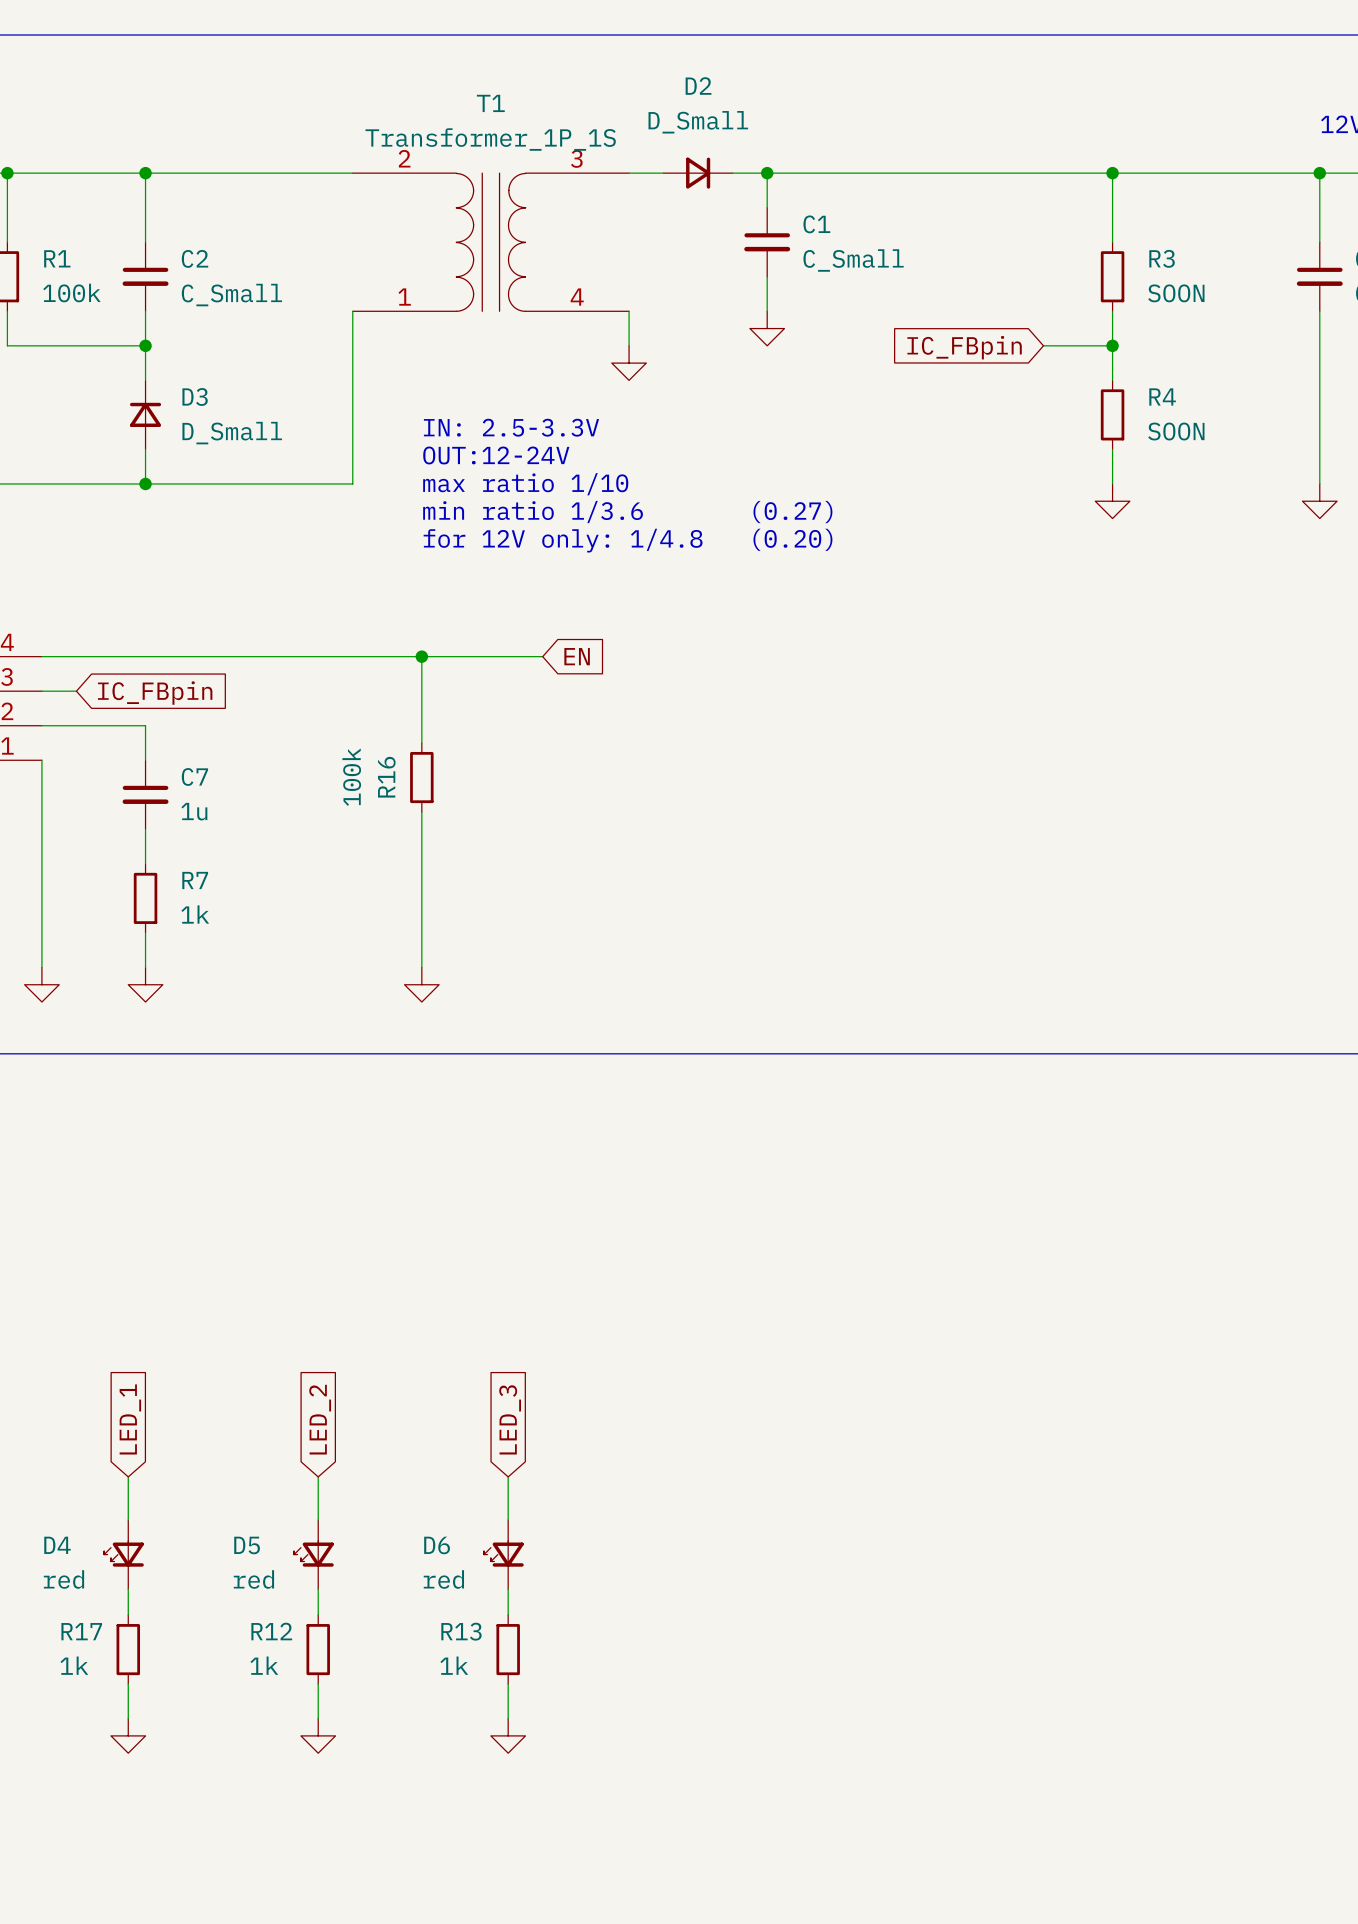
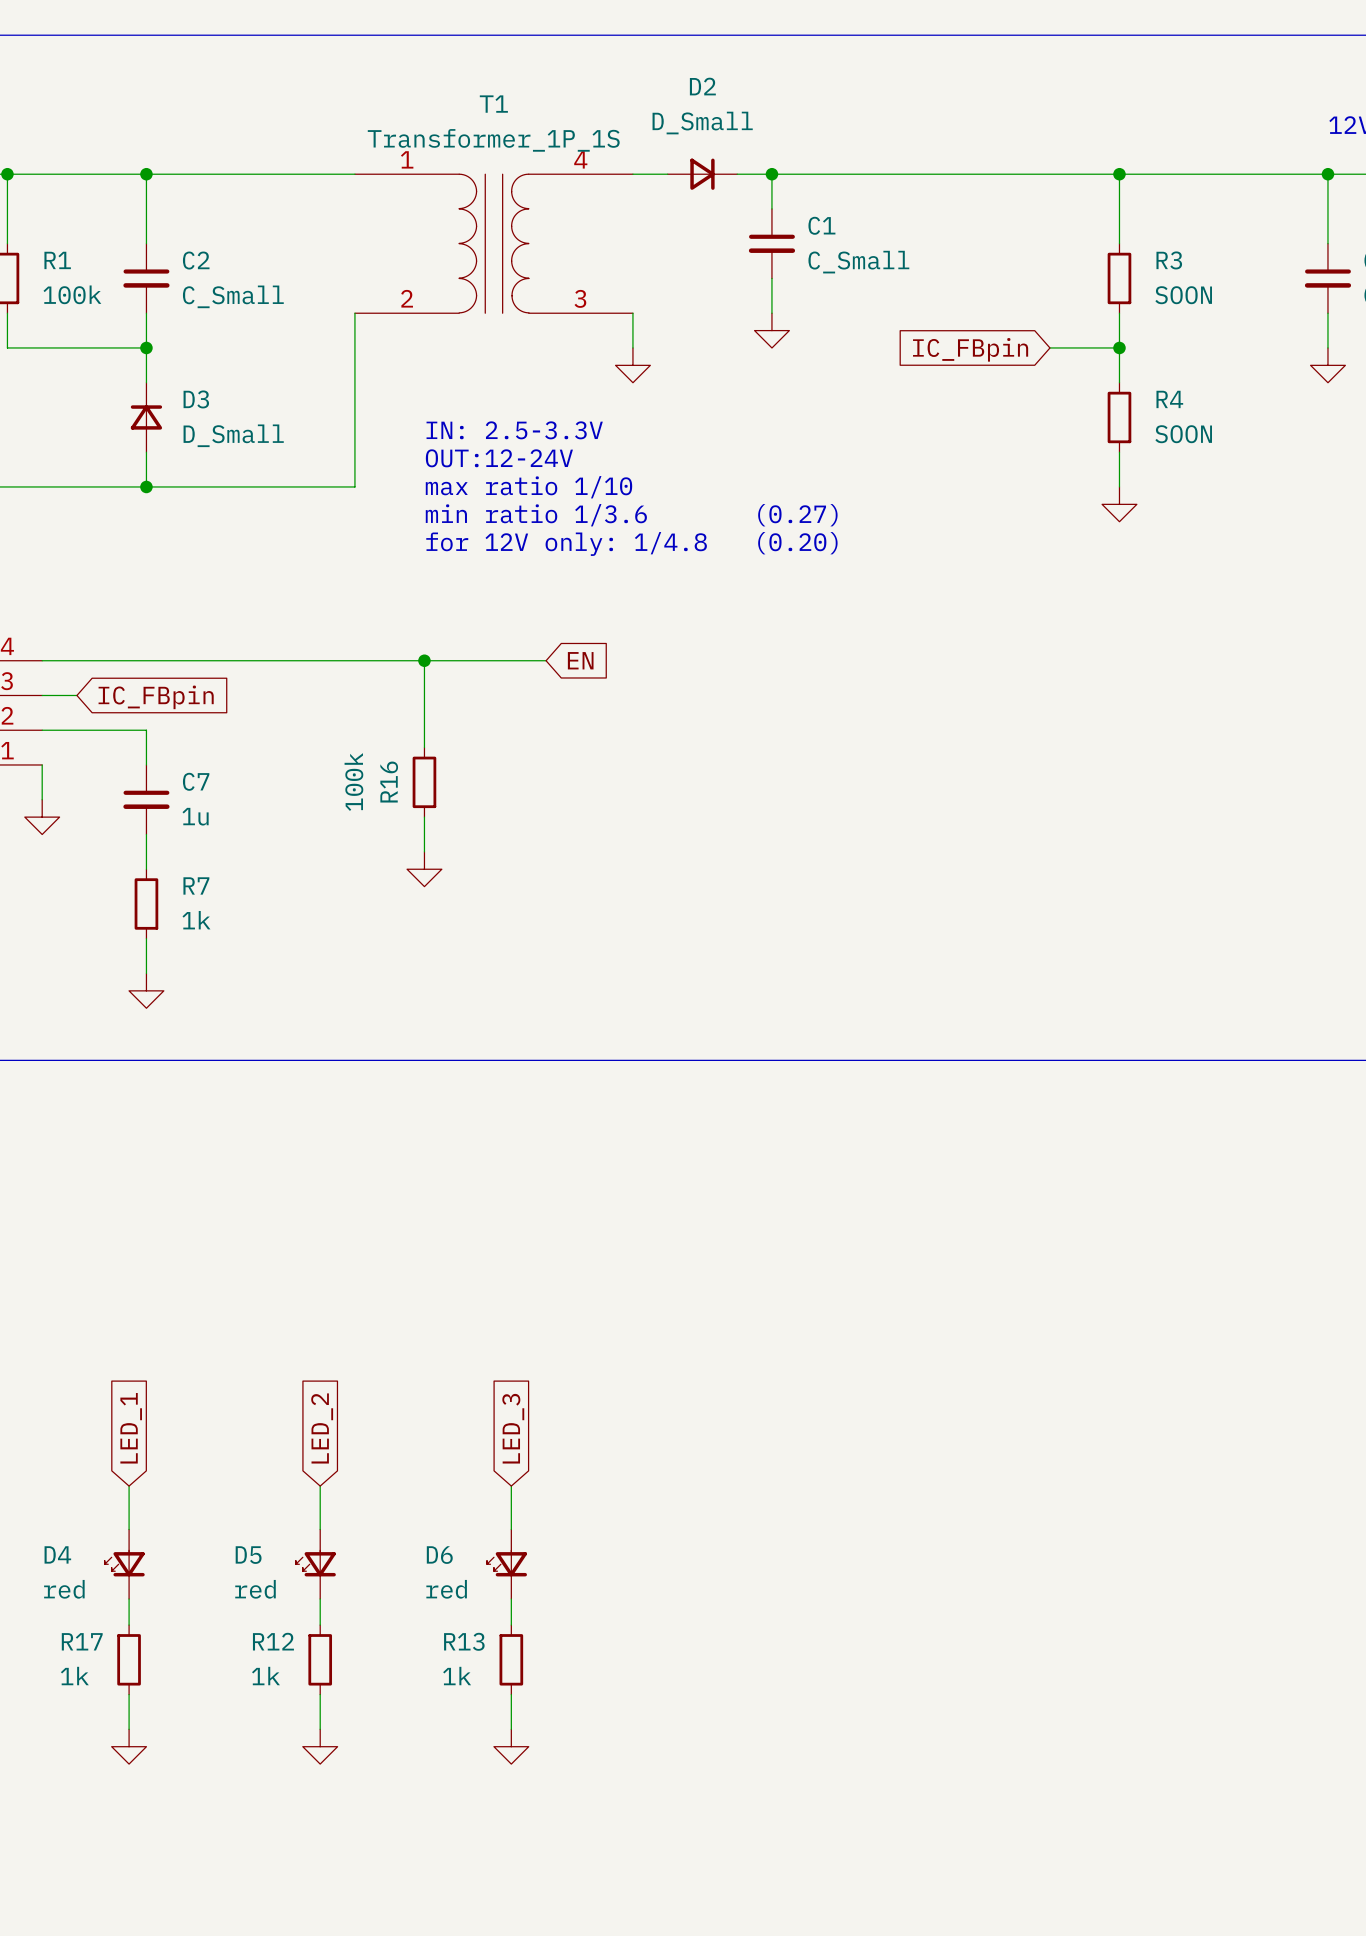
T1 flip: as is (491, 242) -> up-down (494, 243)
wire: (1319, 345) (1319, 483) -> none
power symbol position: (1319, 501) -> (1327, 365)
wire: (41, 794) (41, 967) -> none
wire: (421, 846) (421, 967) -> none
power symbol position: (41, 984) -> (42, 817)
power symbol position: (421, 984) -> (424, 869)

